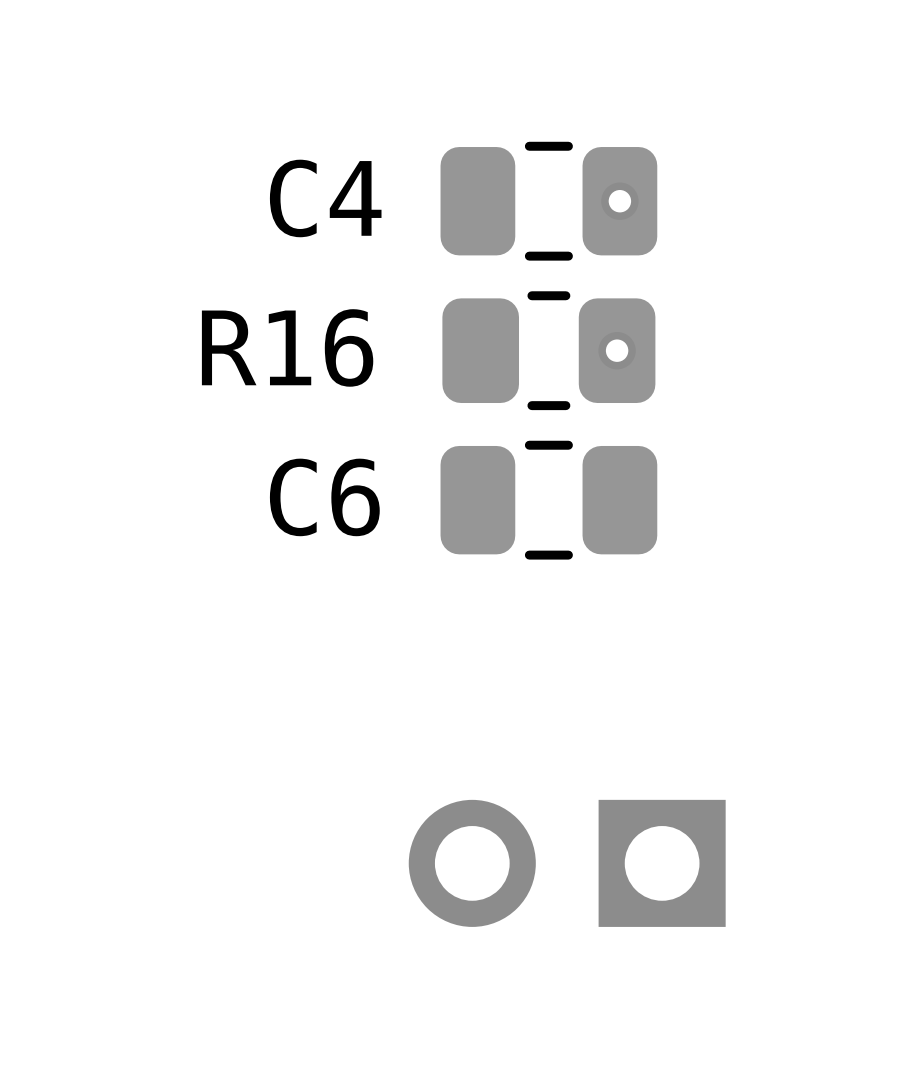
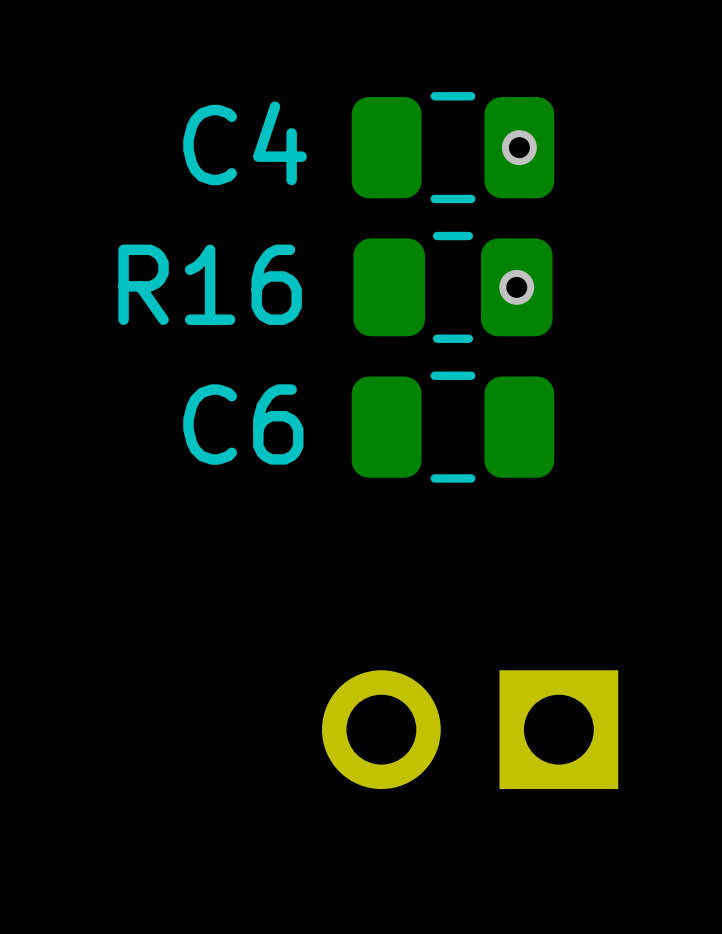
part position: (567, 863) -> (470, 729)

